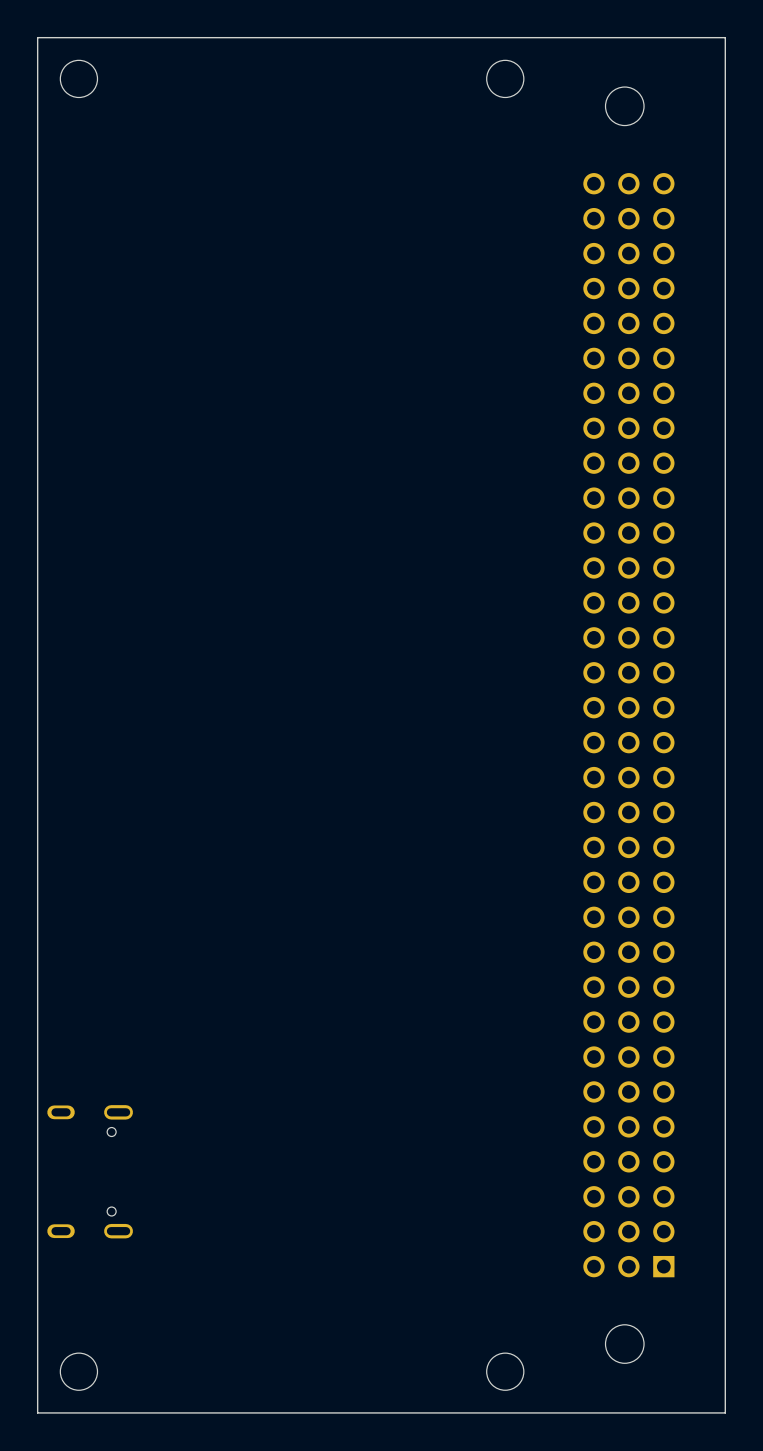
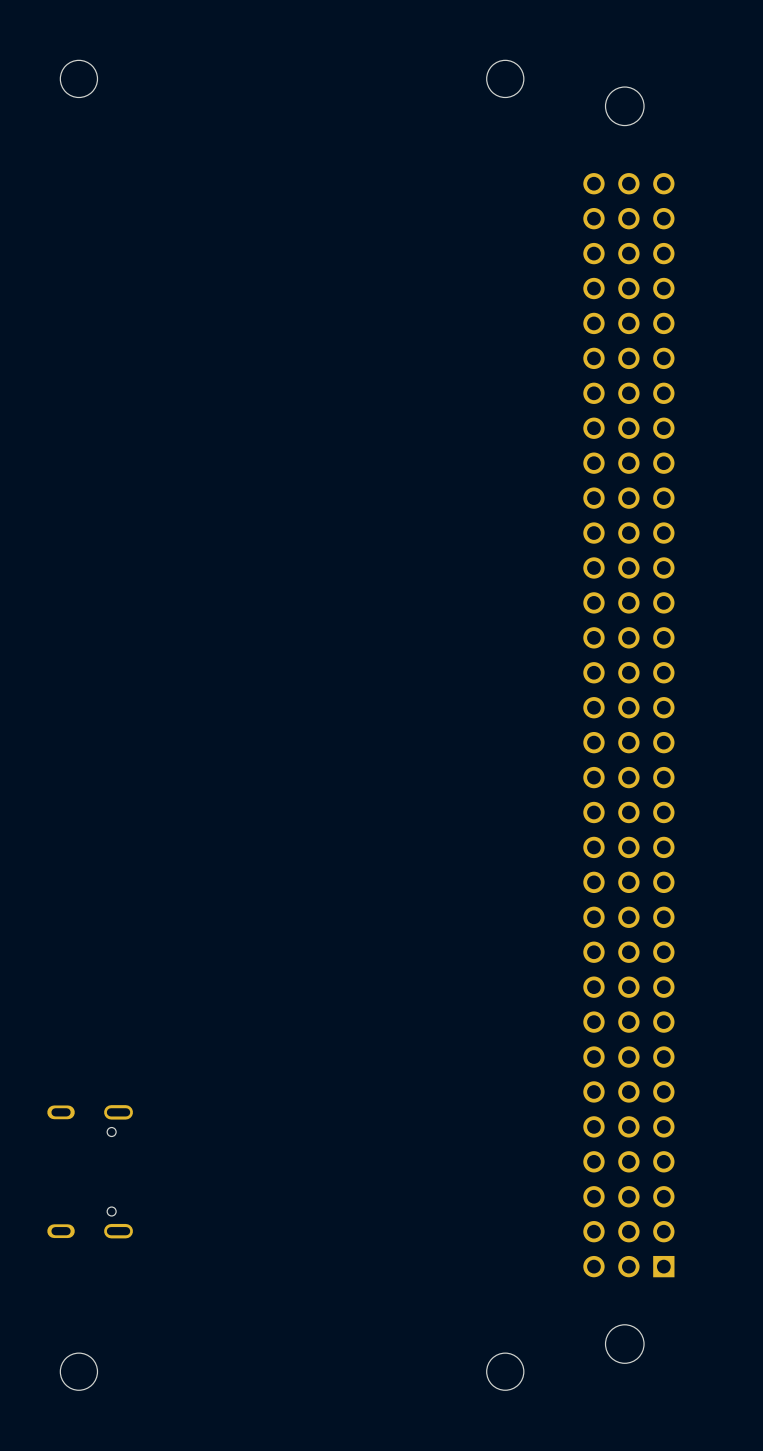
board edge: (725, 37) (37, 37) (37, 1412) (725, 1412) (725, 37) -> none

